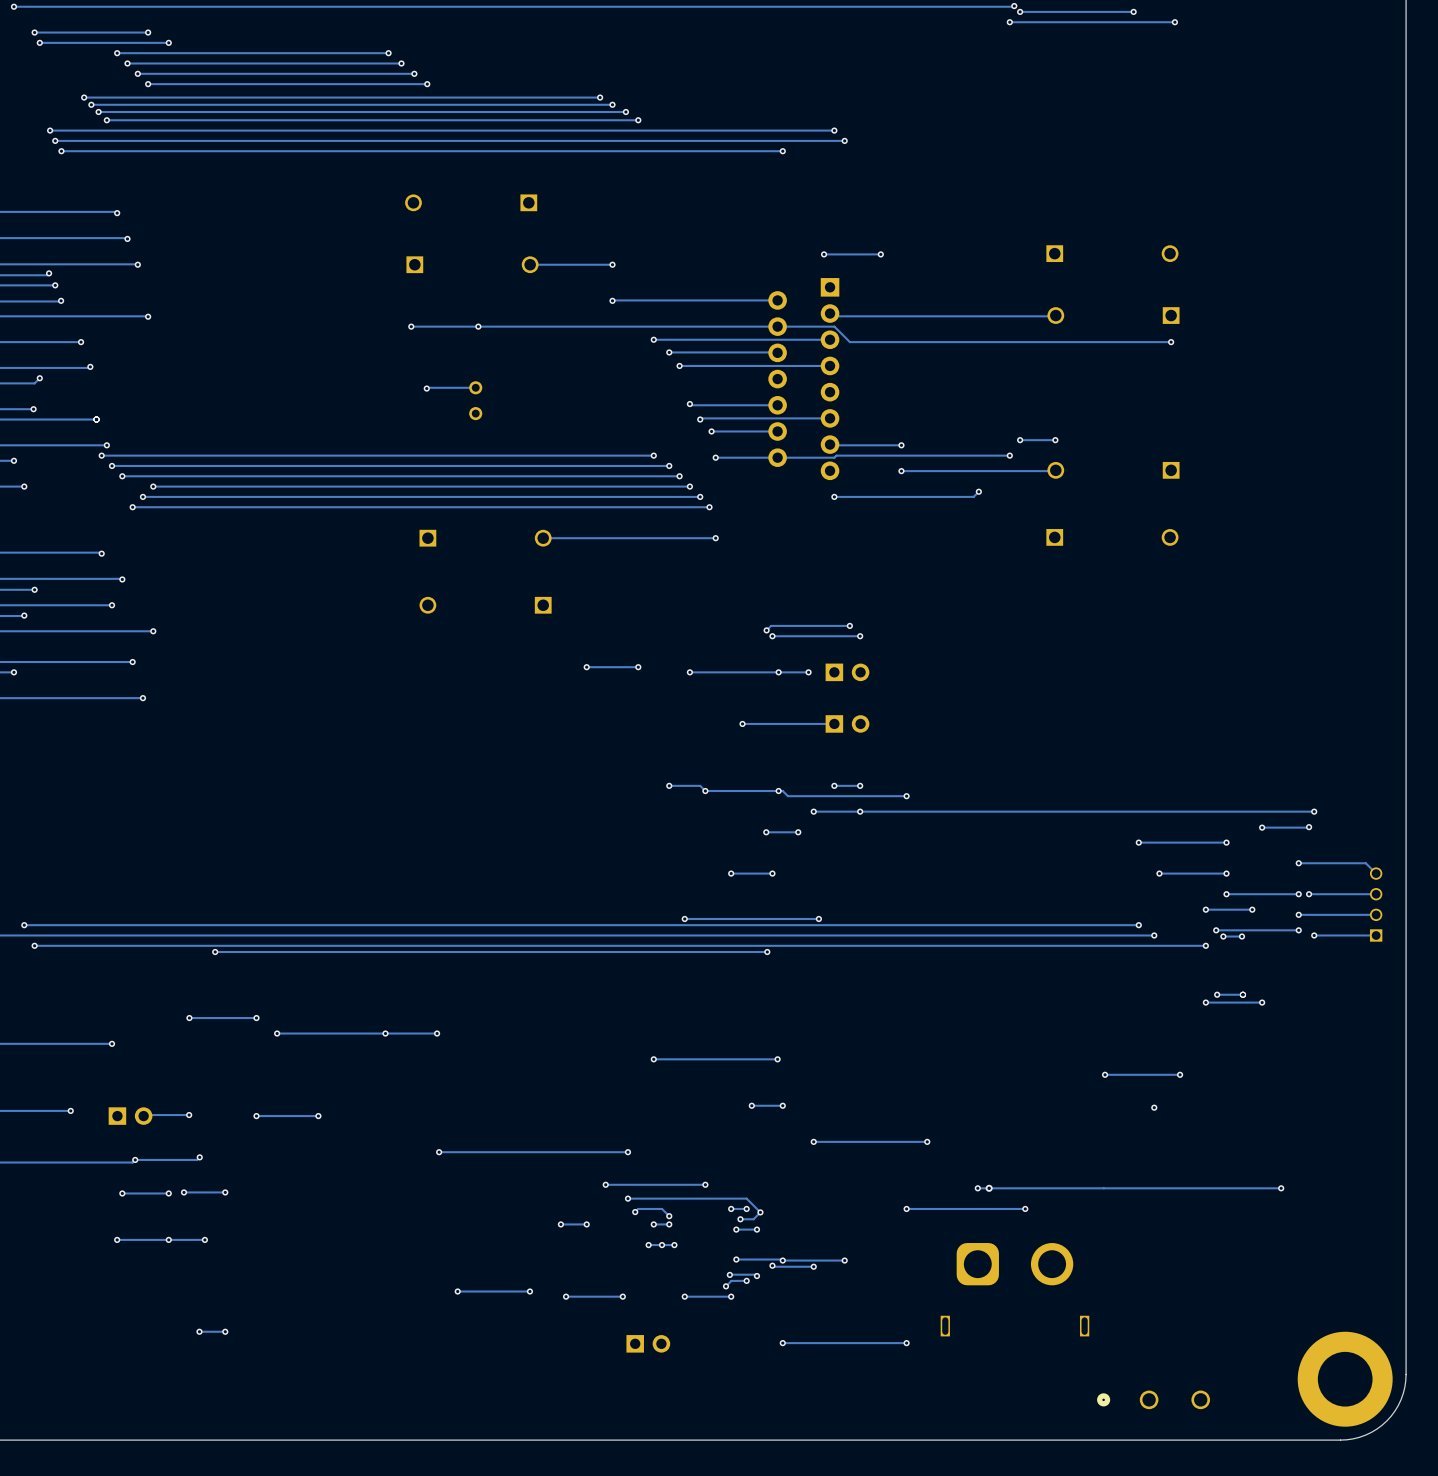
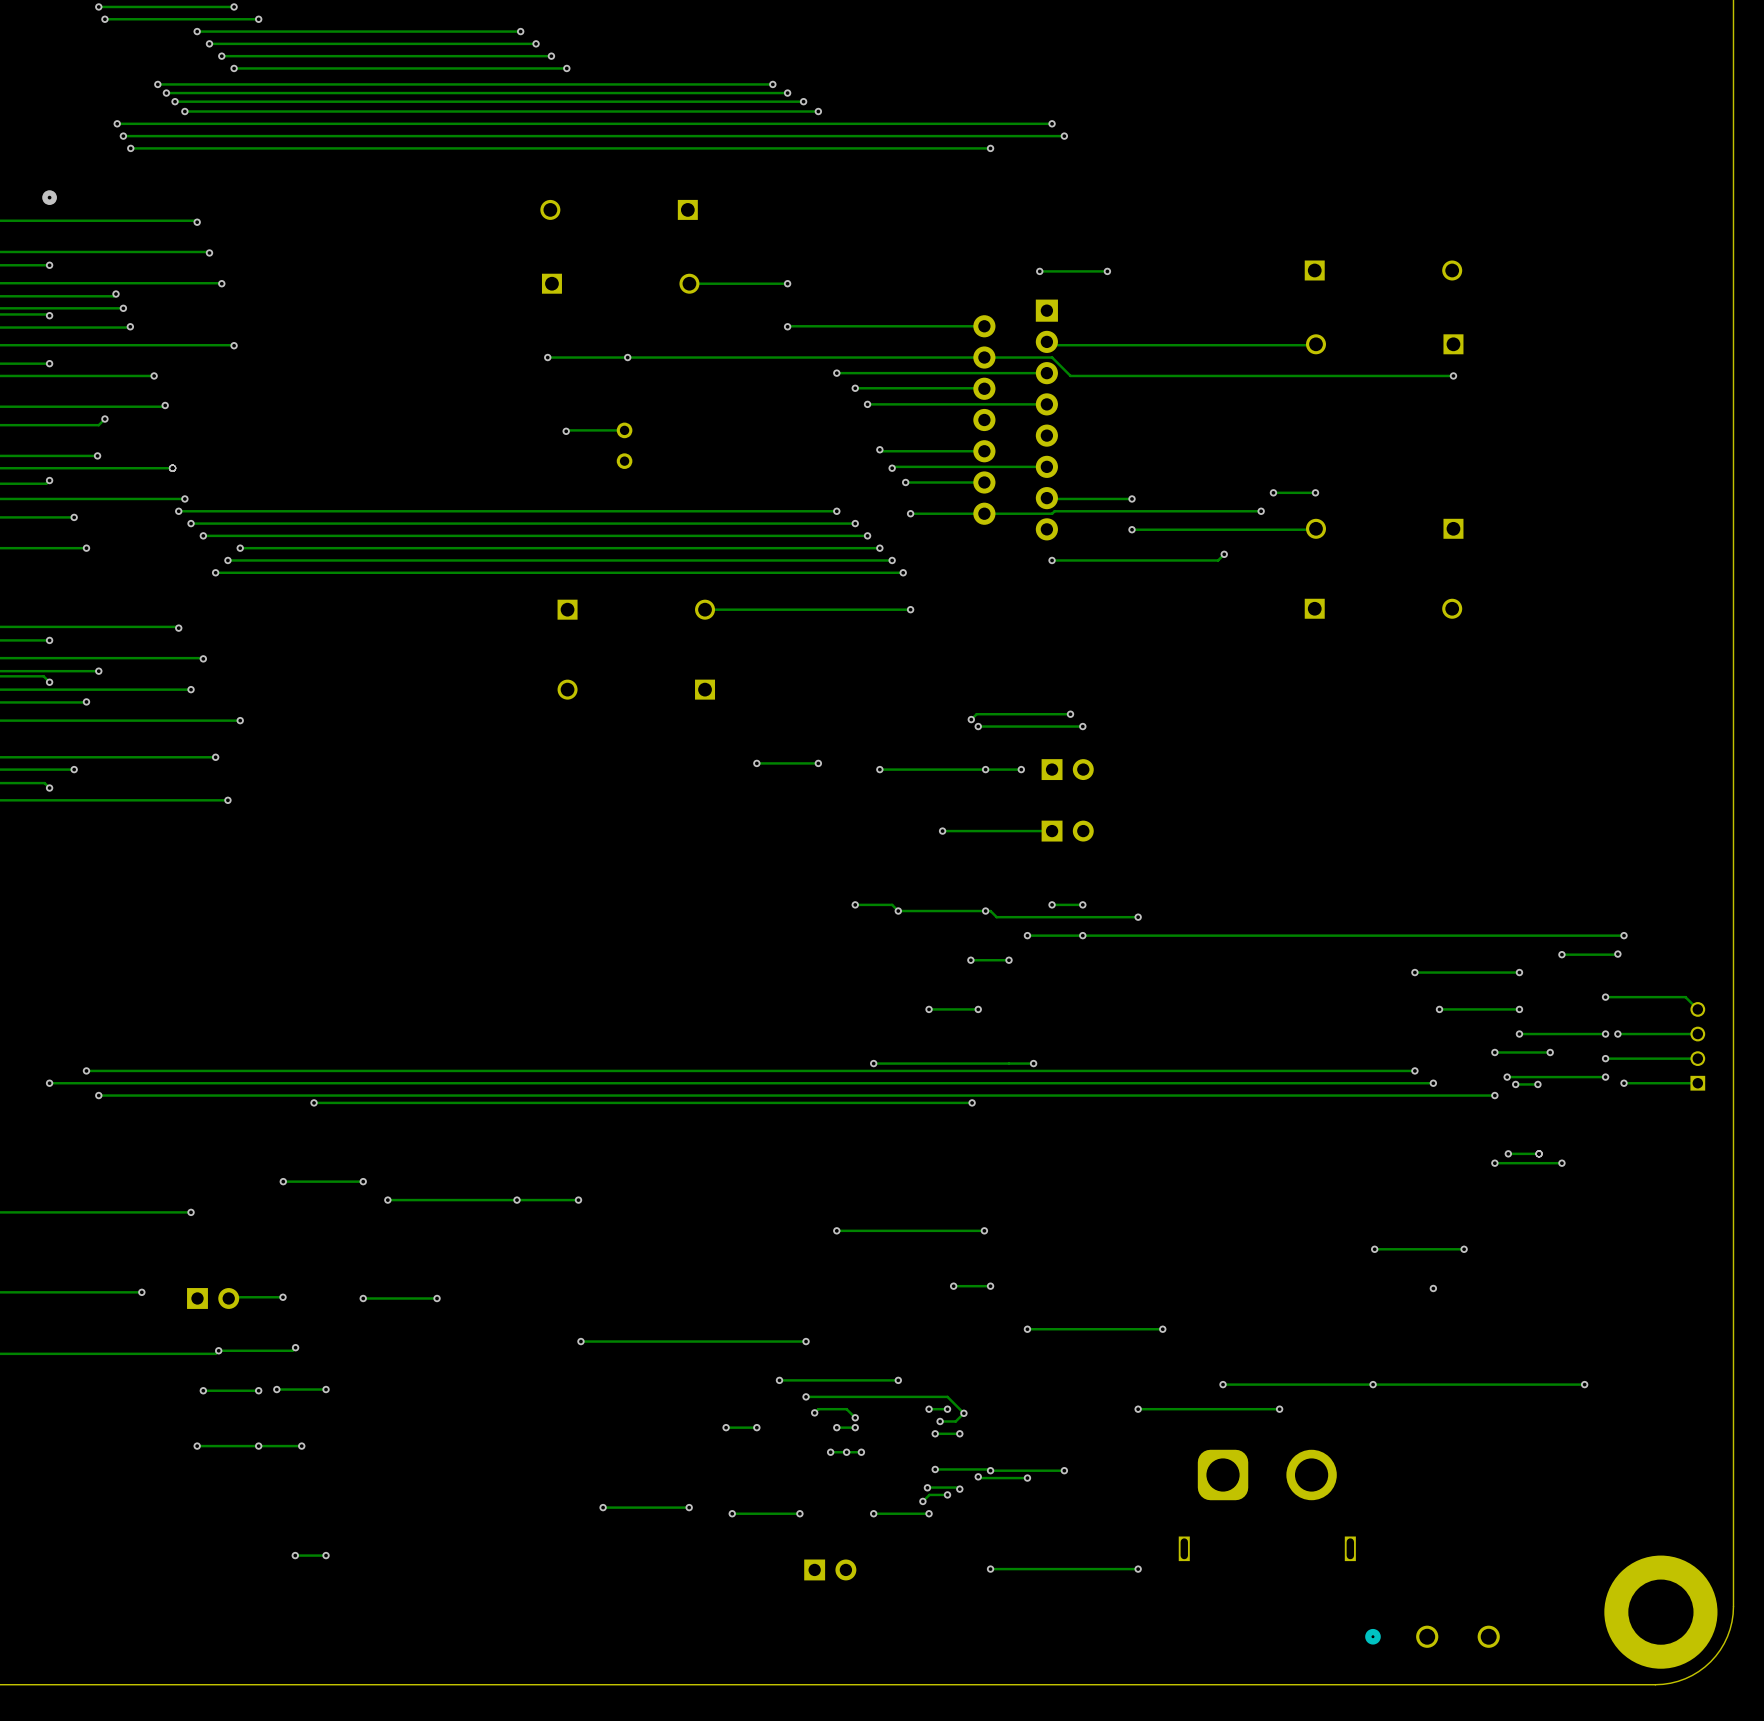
via: (989, 1188) -> none
via: none -> (1373, 1384)

